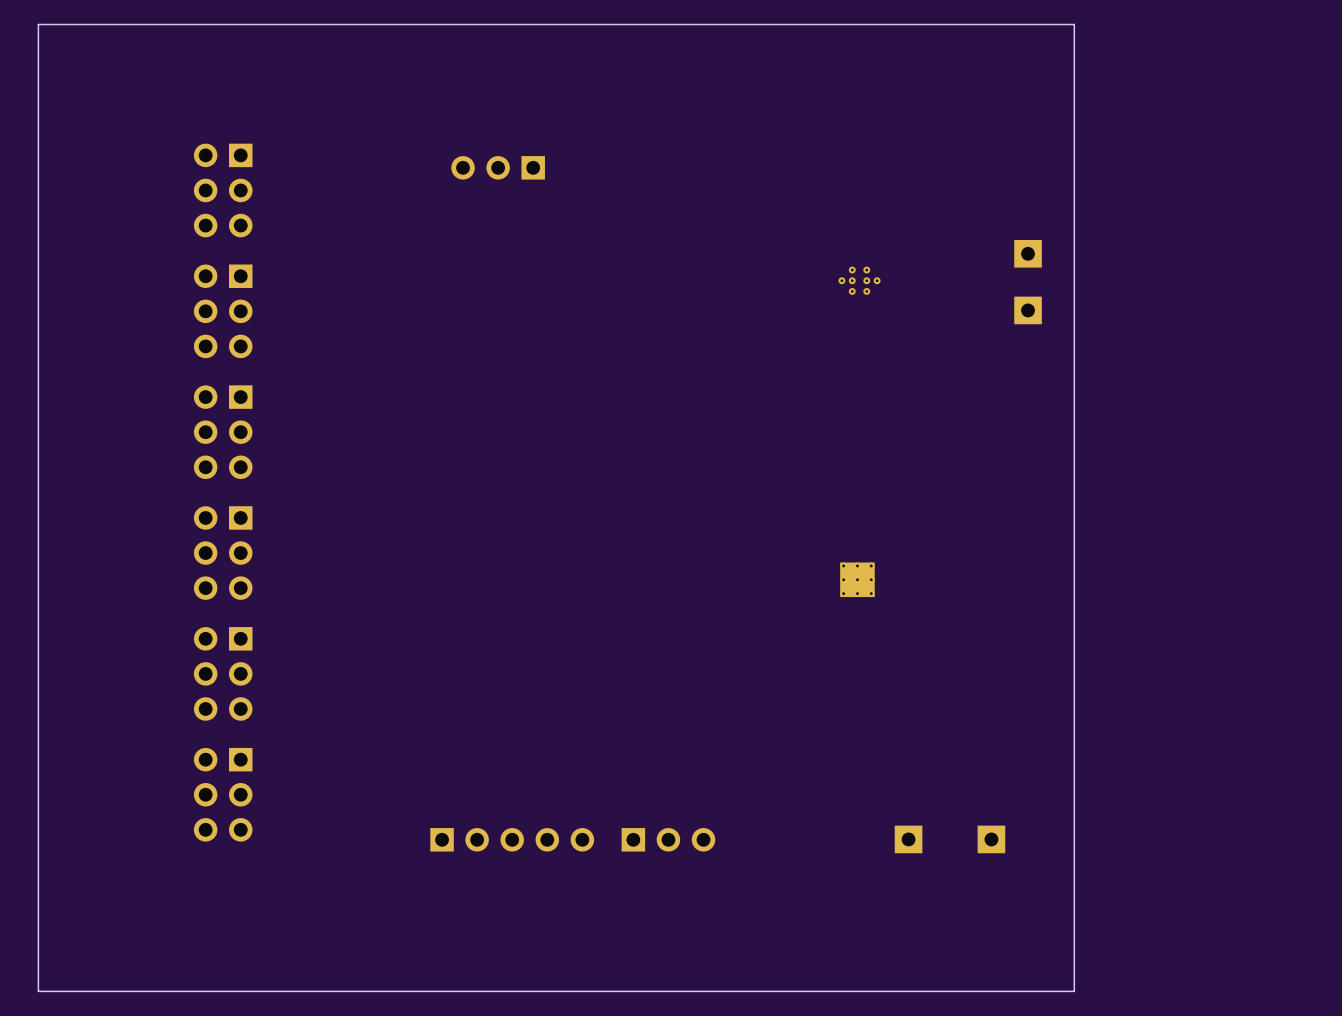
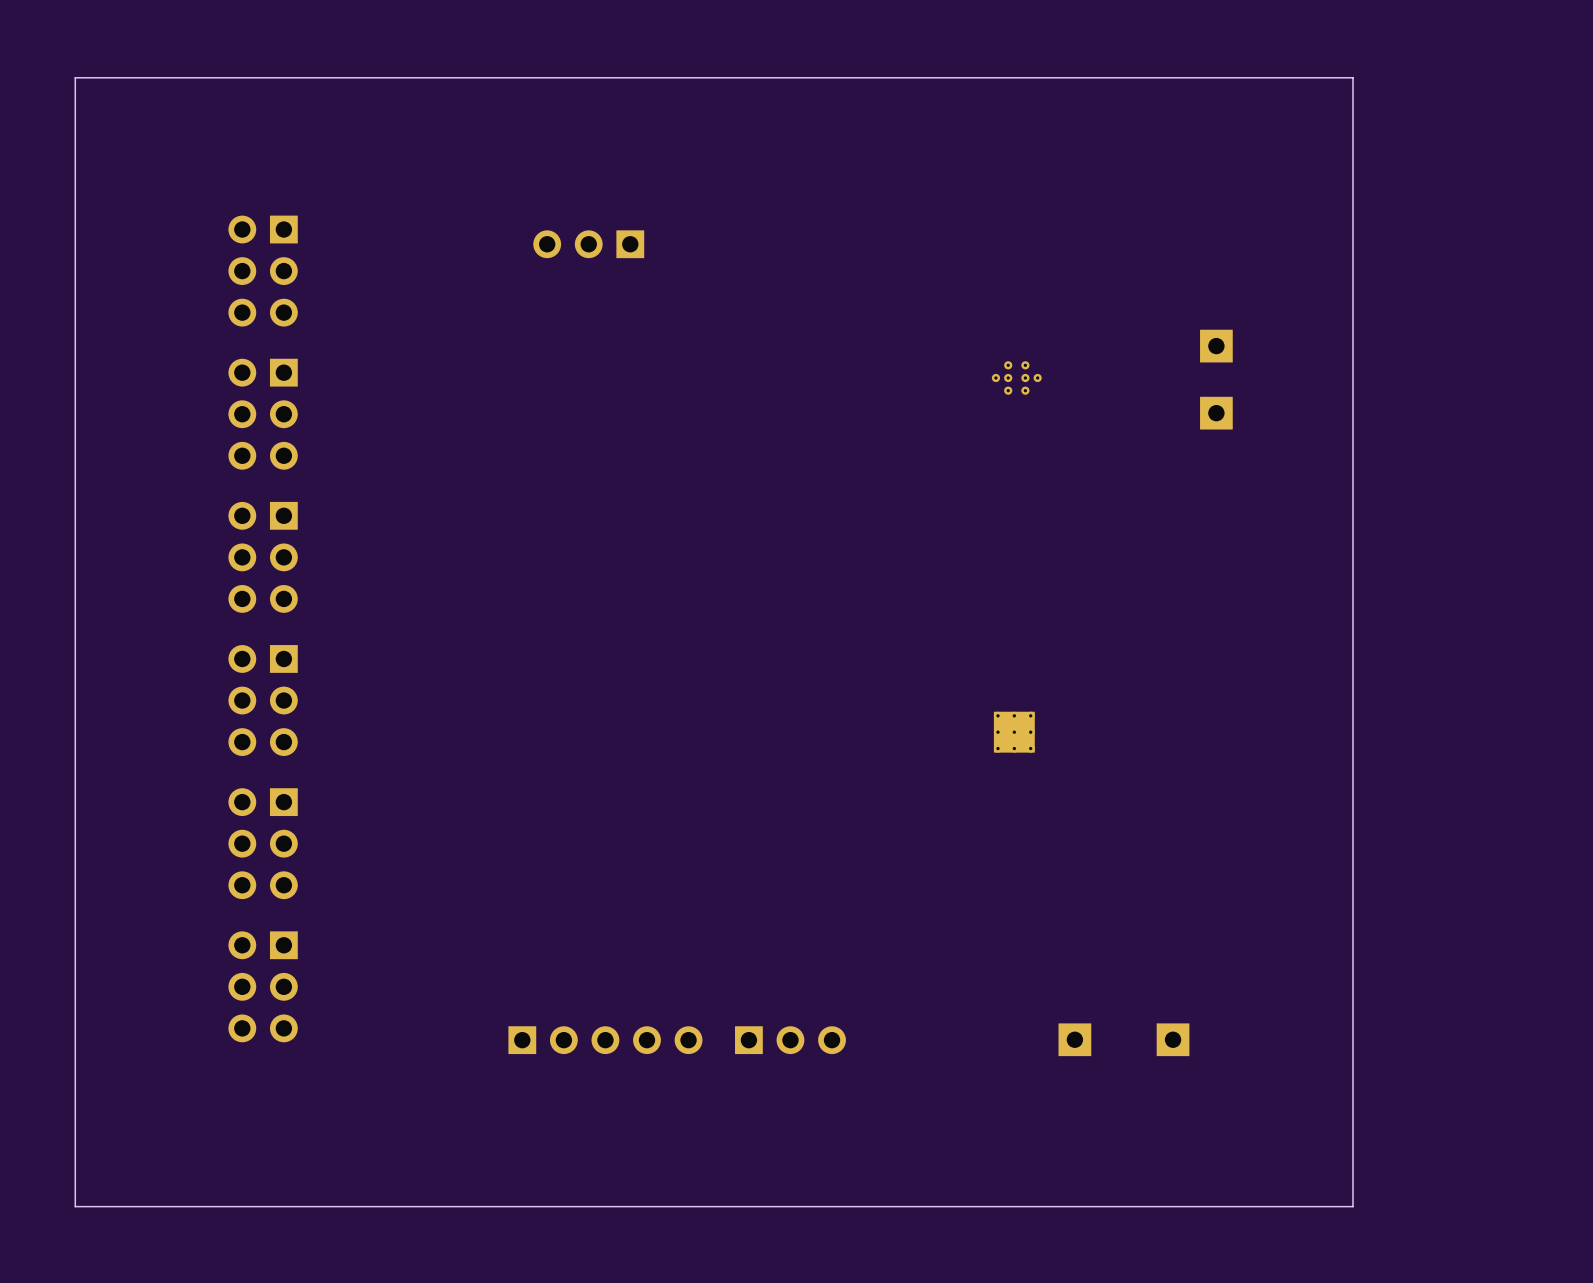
board edge: (1074, 24) (38, 24) (38, 991) (1074, 991) (1074, 24) -> (1353, 77) (1353, 1206) (75, 1206) (75, 77) (1353, 77)

